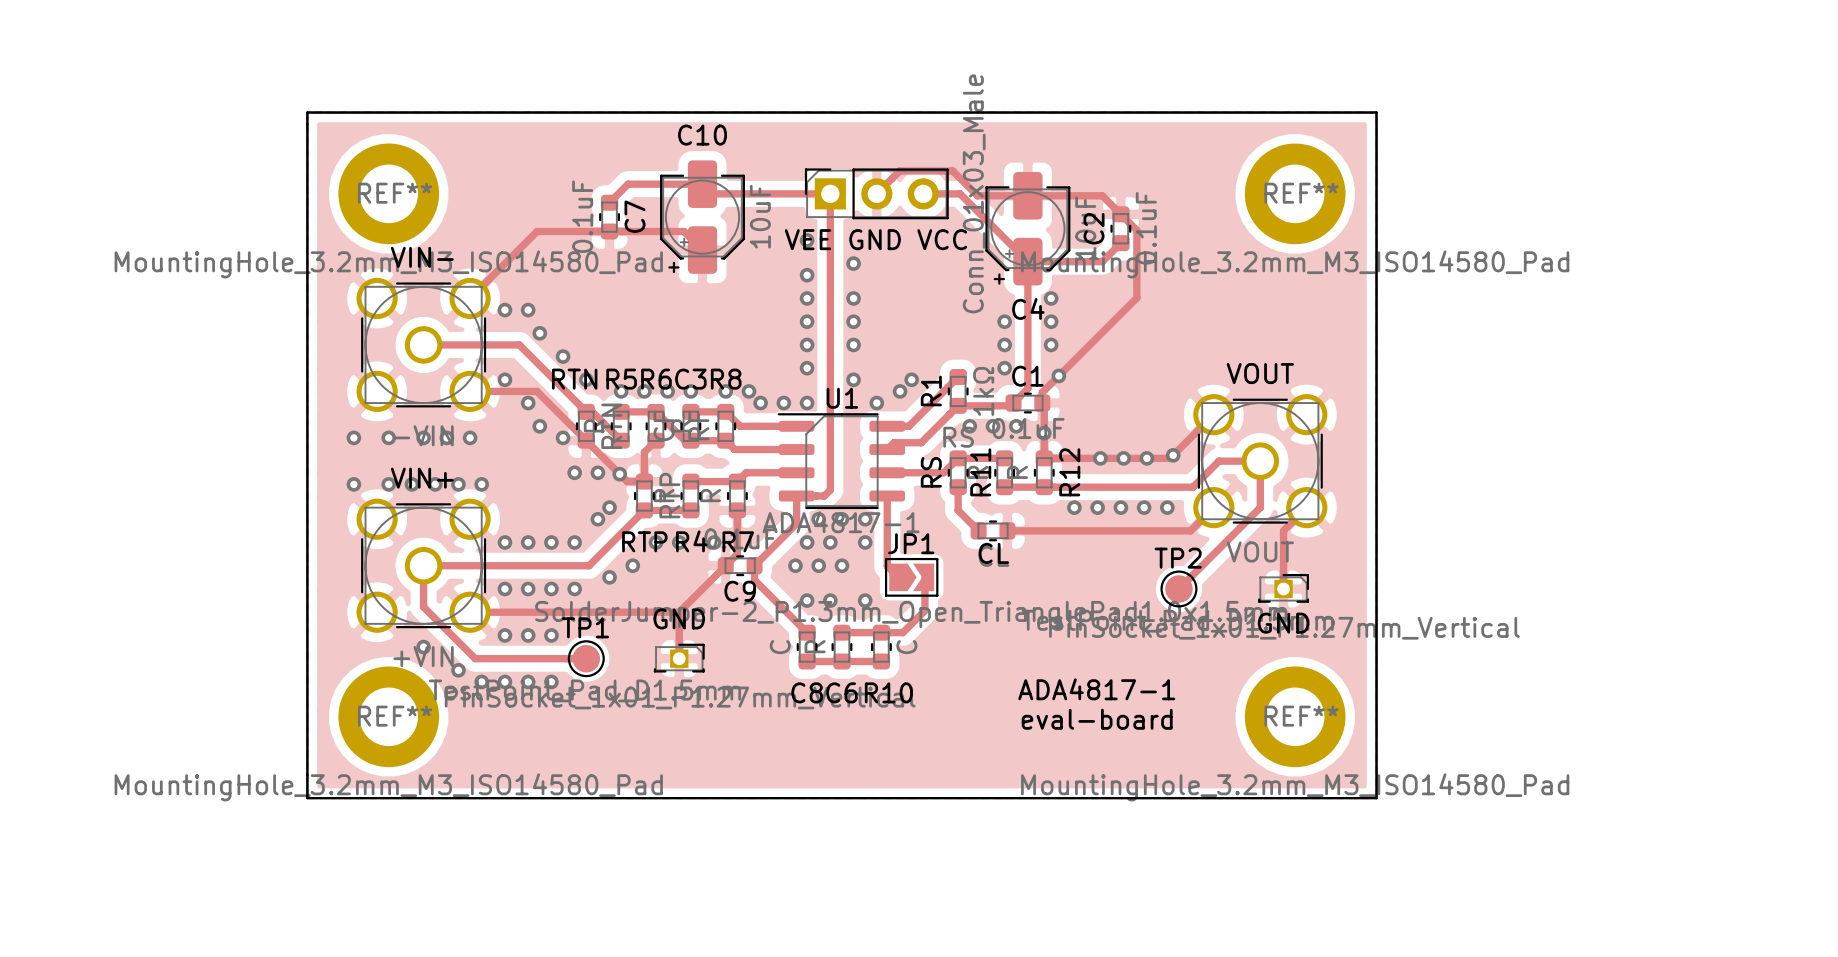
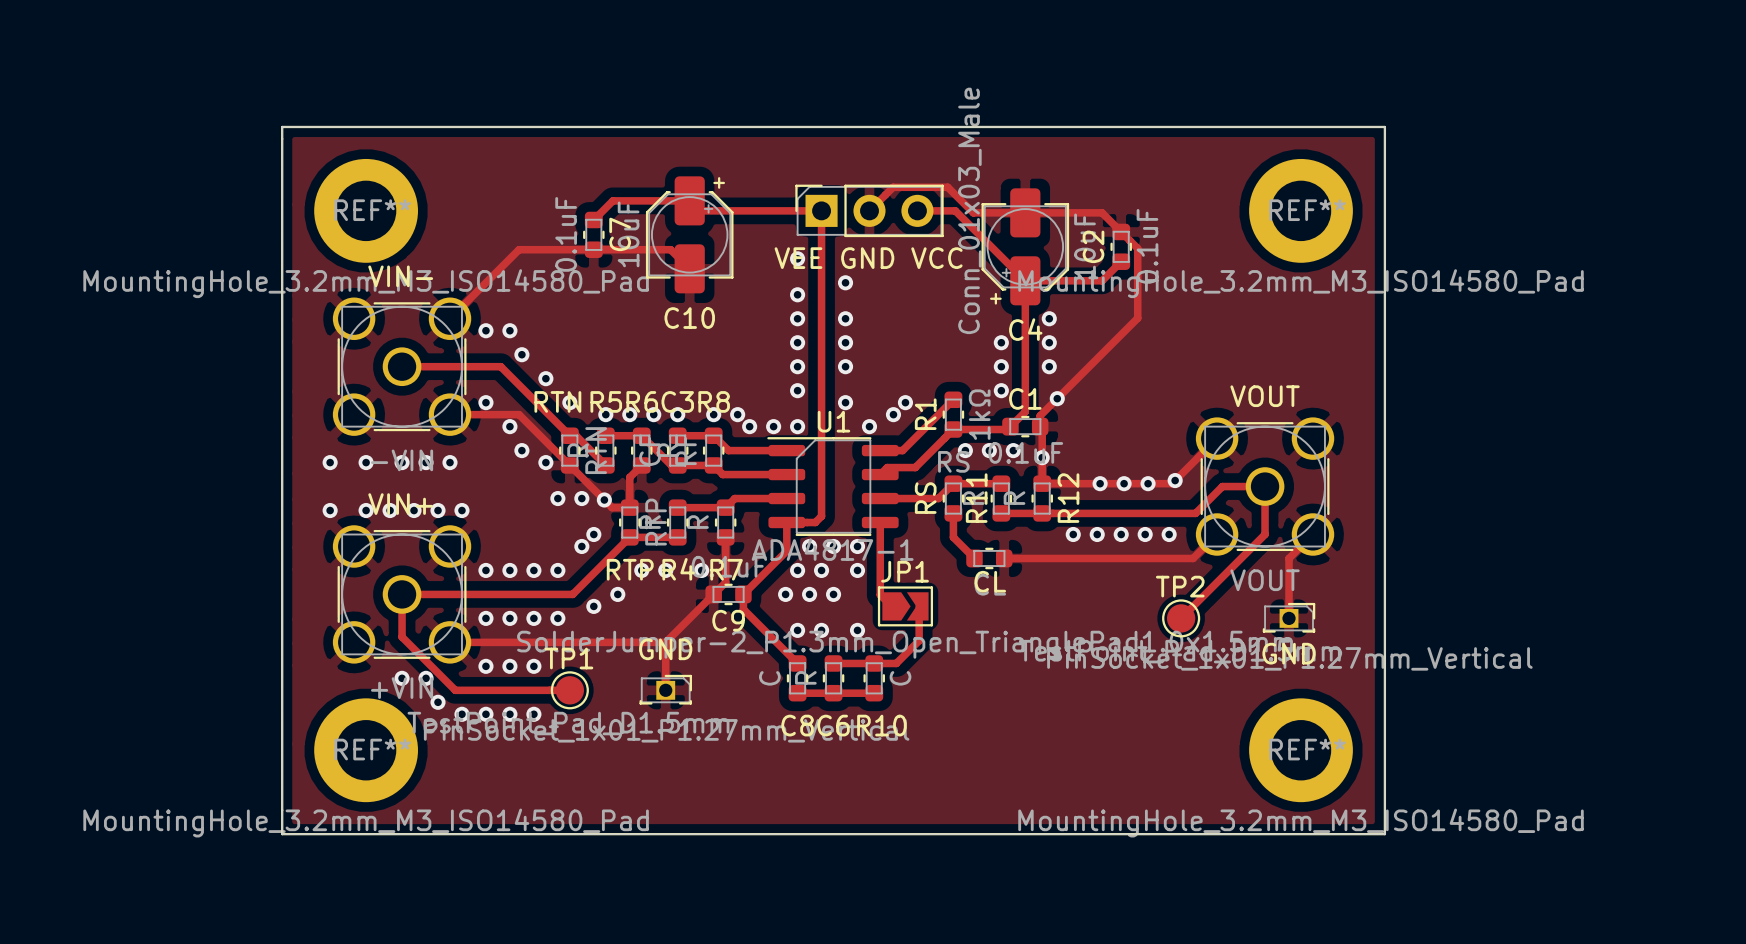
C10 rotation: 0° (702, 217) -> 180° (689, 234)
via: none -> (426, 678)
text: ADA4817-1 (1096, 689) -> none
text: eval-board (1097, 719) -> none

